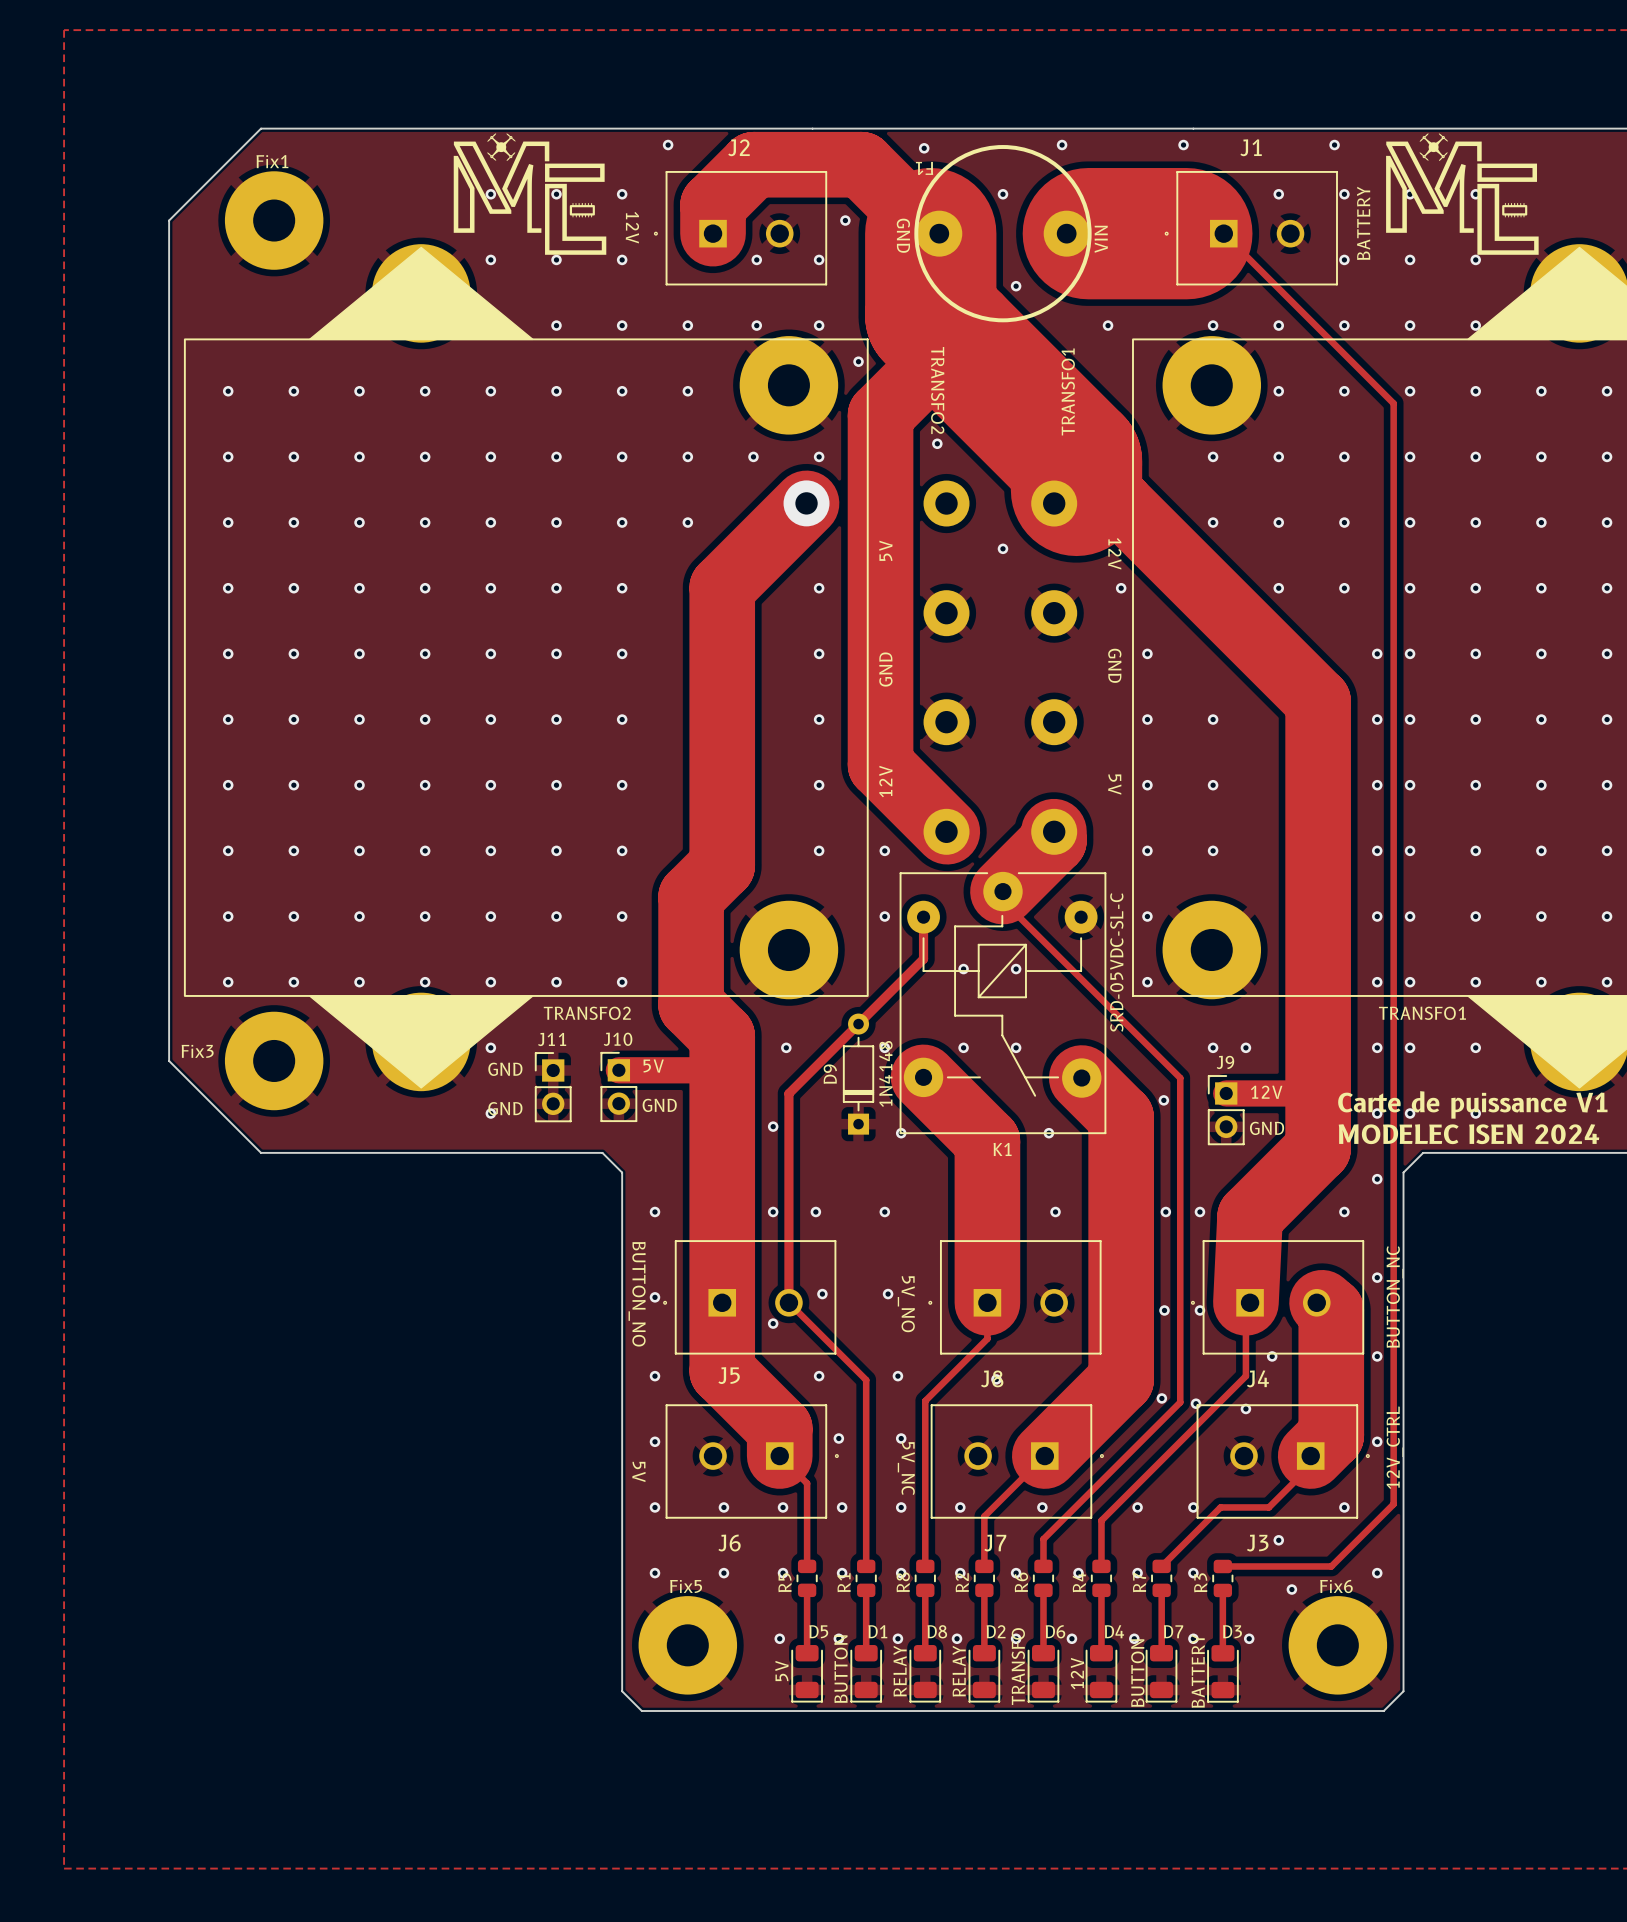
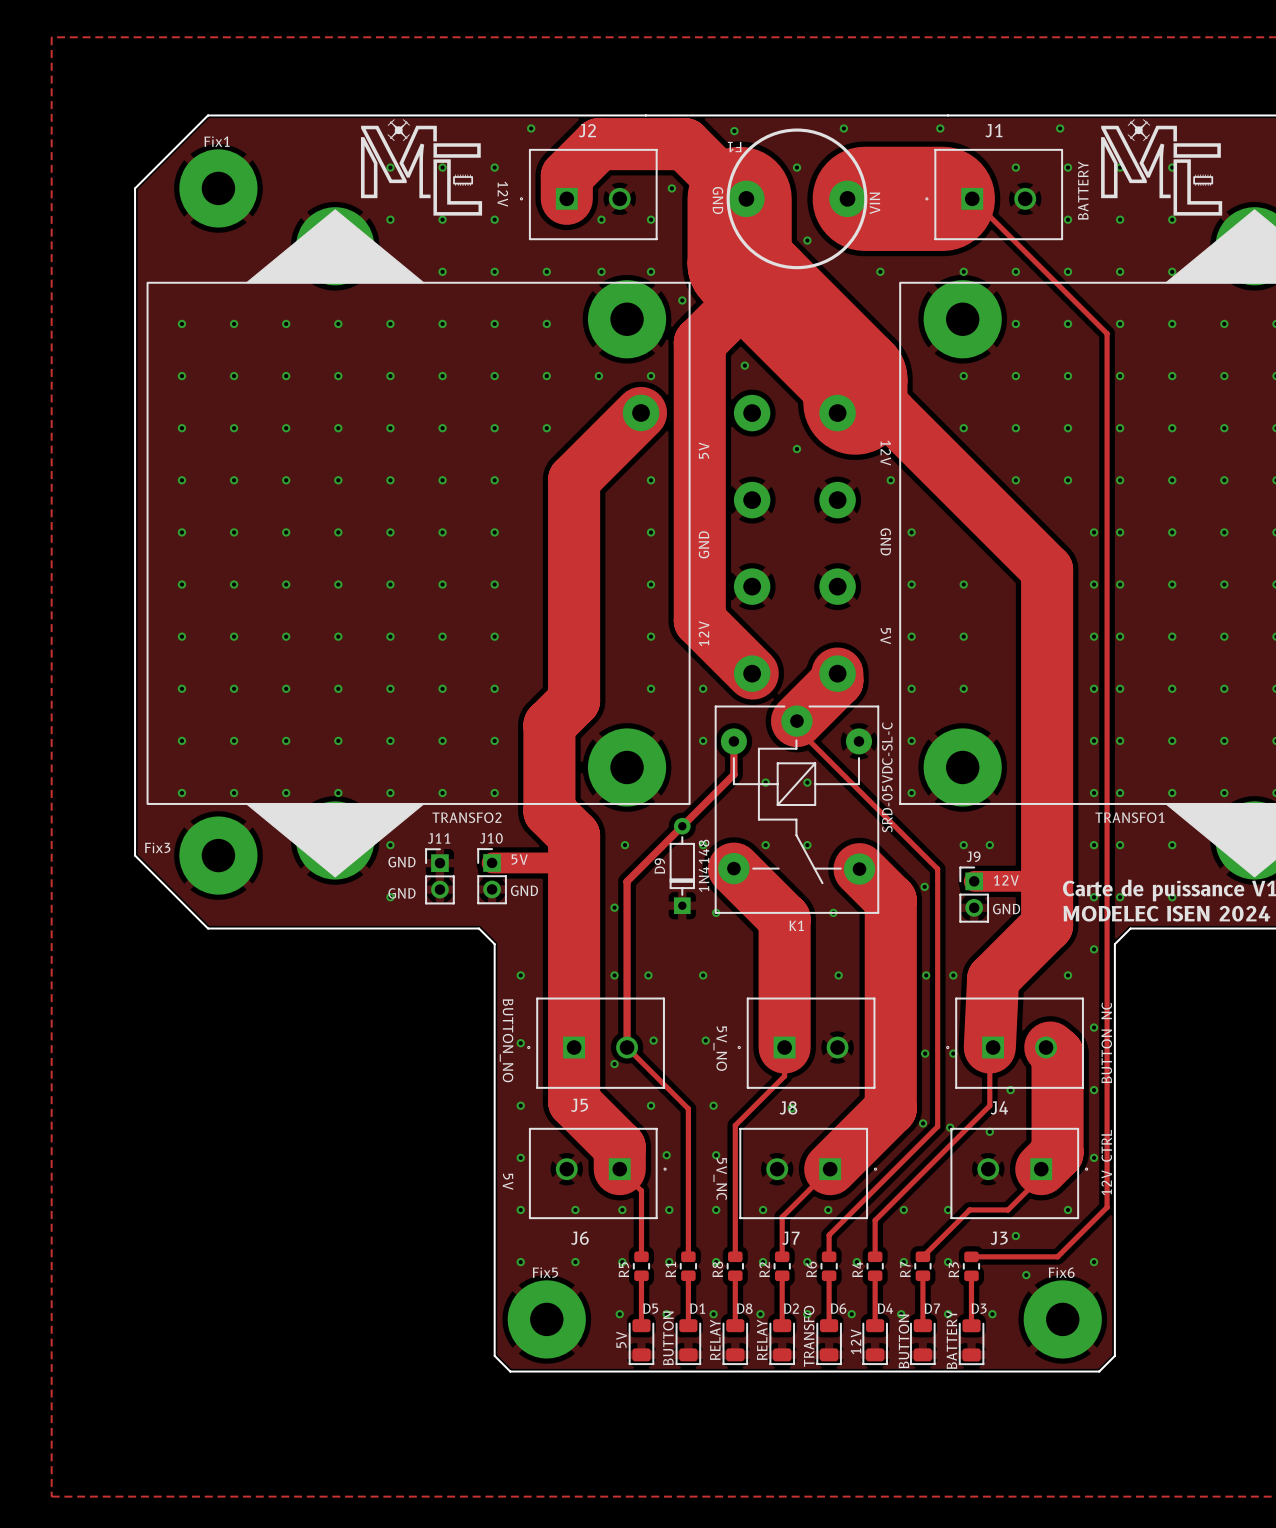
text: TRANSFO2 (937, 390) -> none
text: TRANSFO1 (1068, 391) -> none

